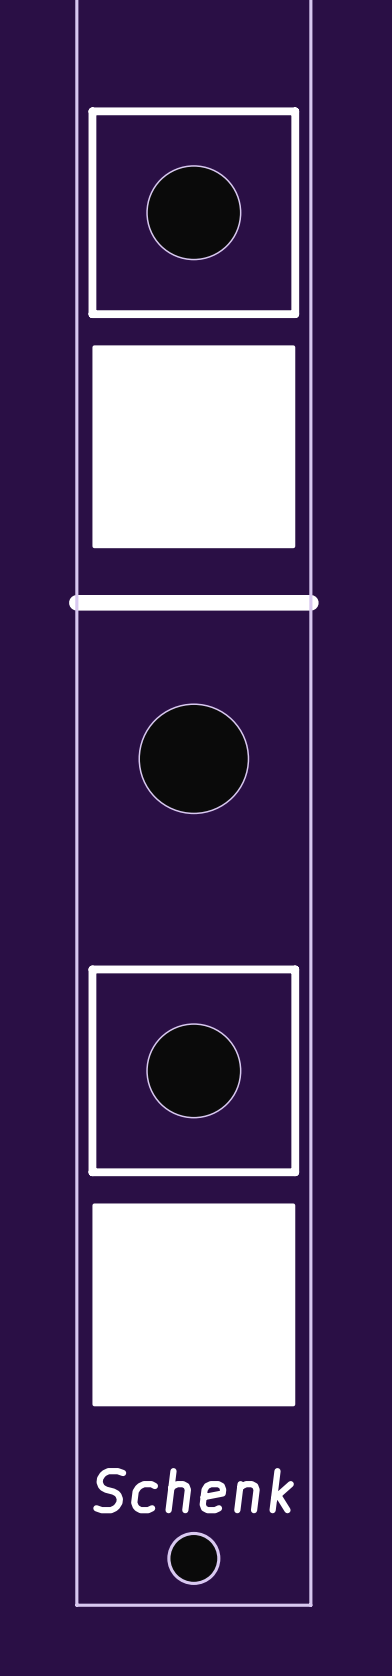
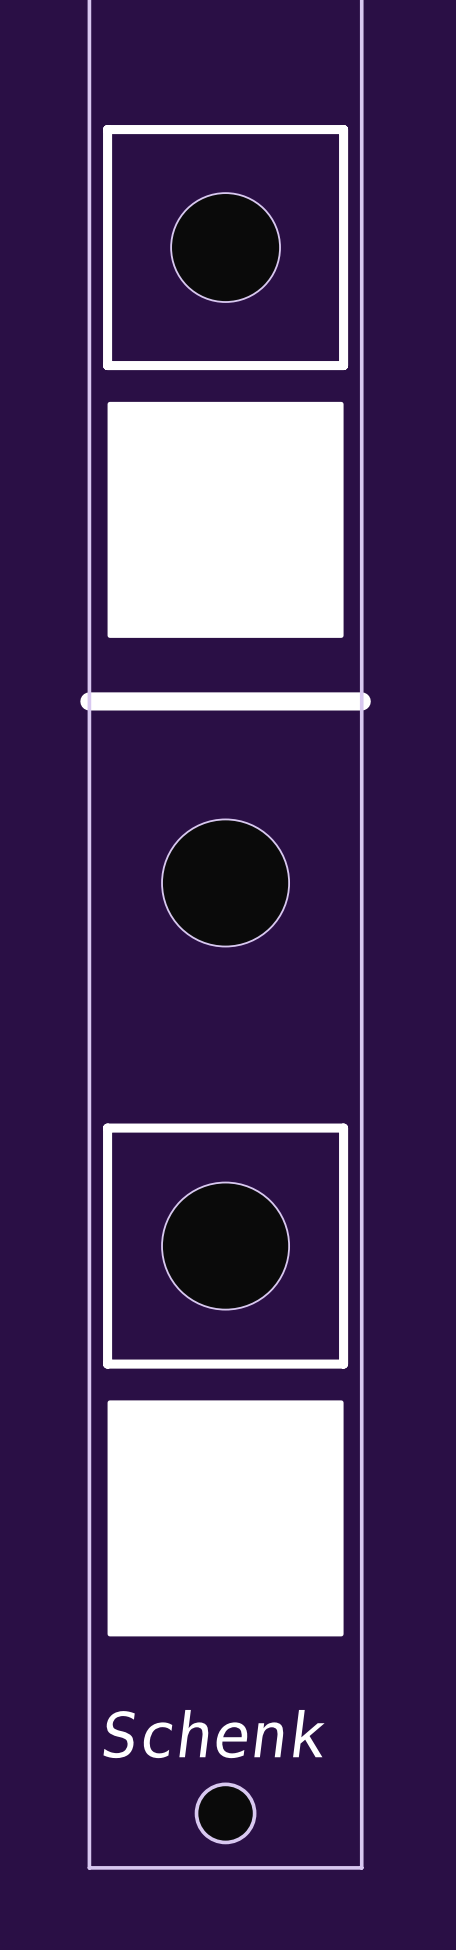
part footprint: [147, 1024, 241, 1118] -> [162, 1182, 290, 1310]

